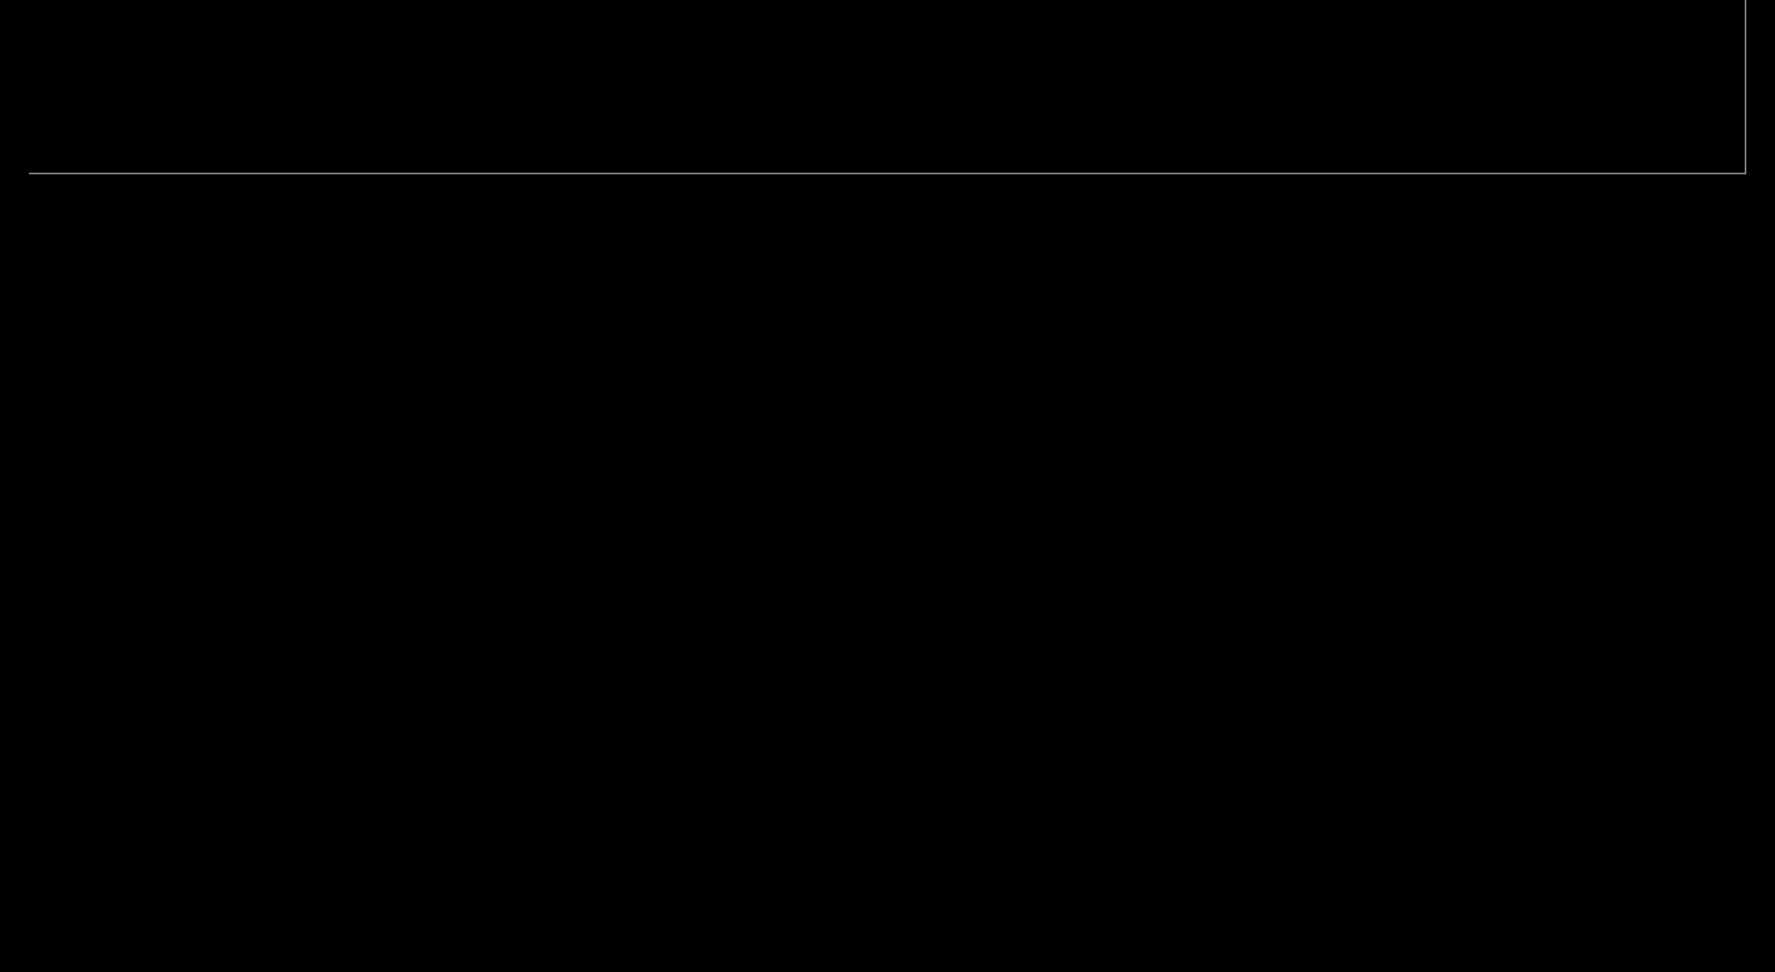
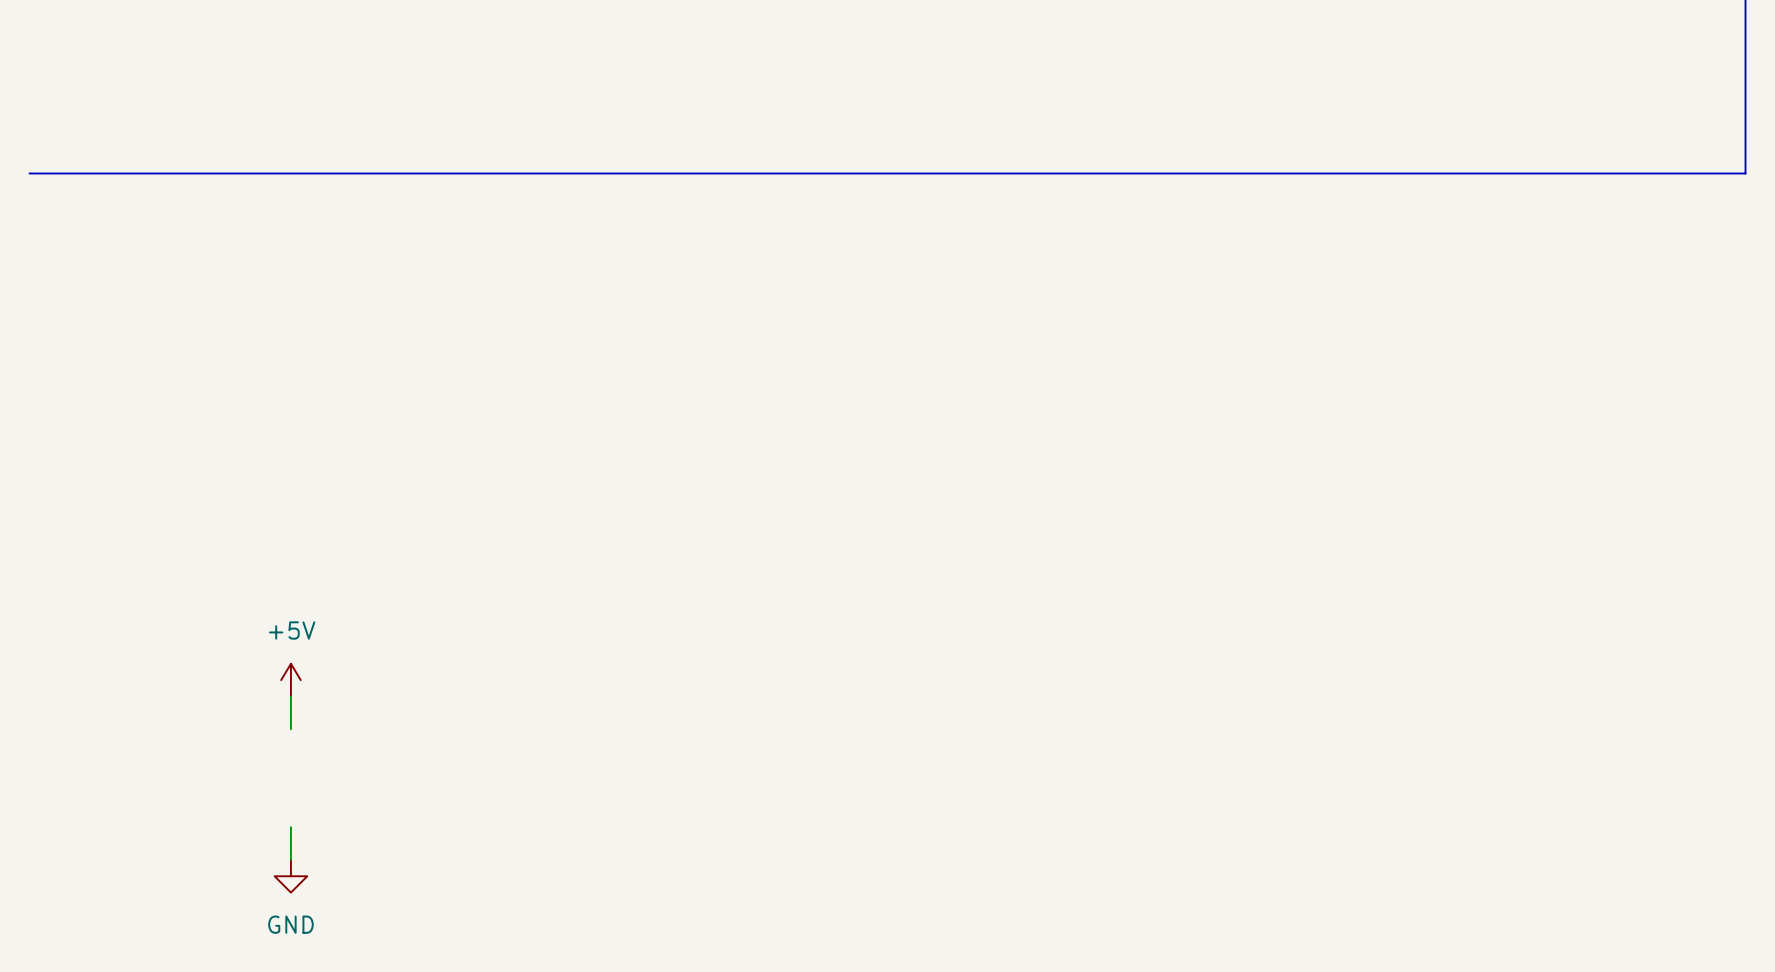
power symbol: none -> +5V (290, 680)
wire: none -> (290, 696) (290, 729)
wire: none -> (290, 827) (290, 859)
power symbol: none -> GND (290, 876)

